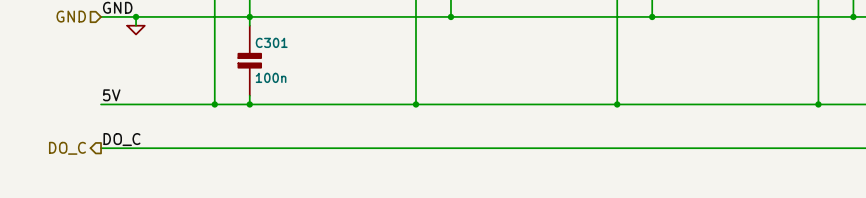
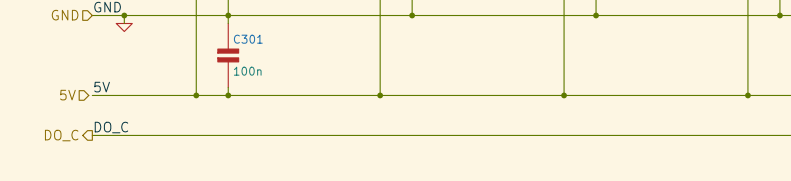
hierarchical label: none -> 5V (67, 95)

